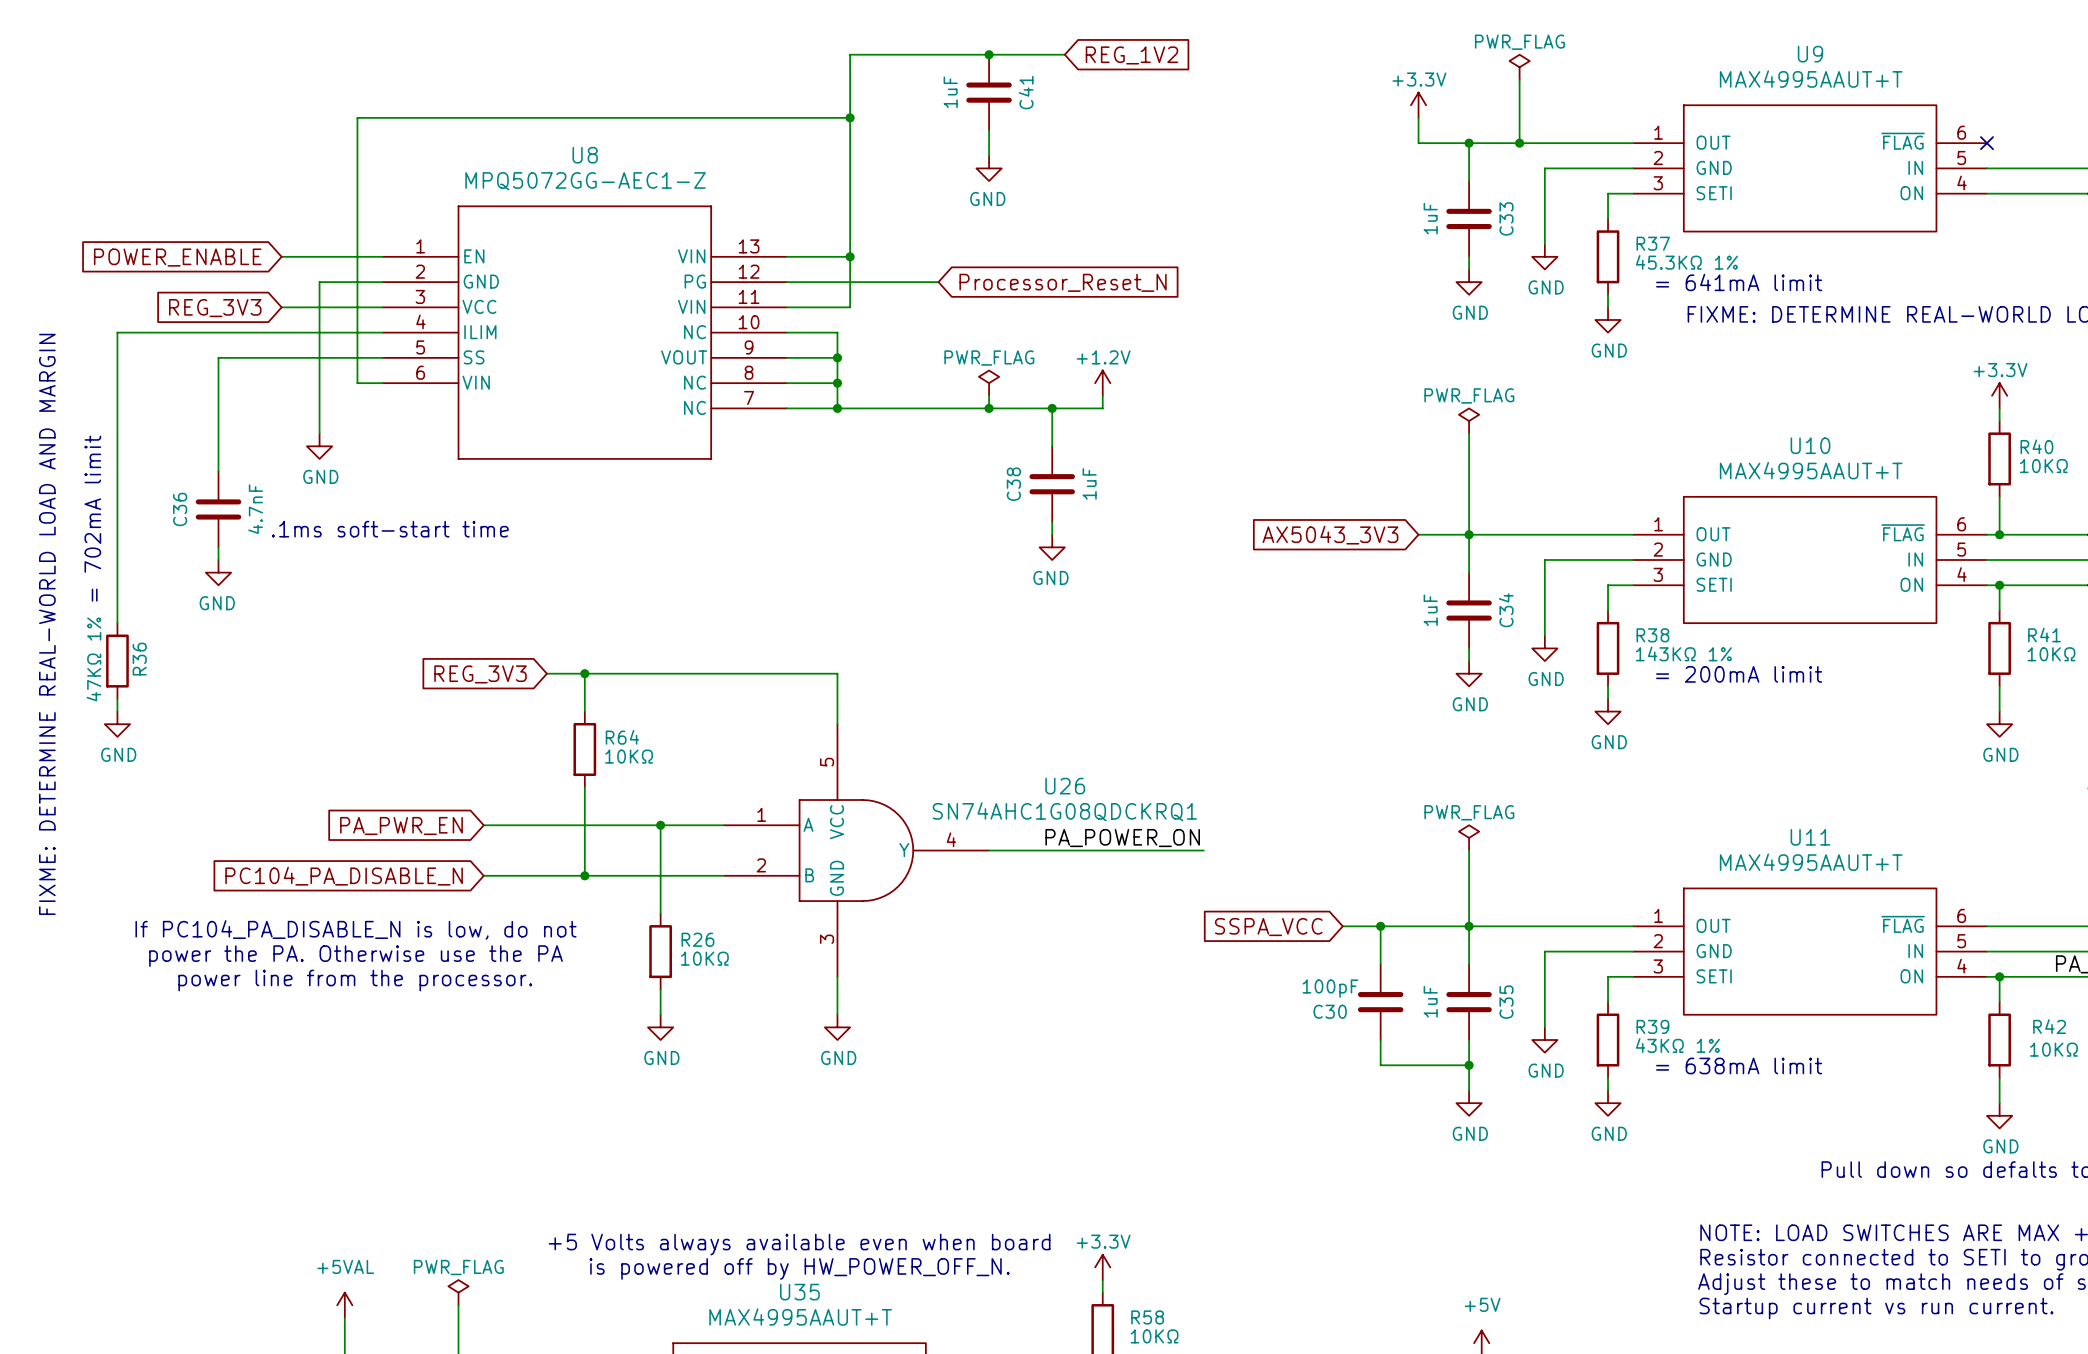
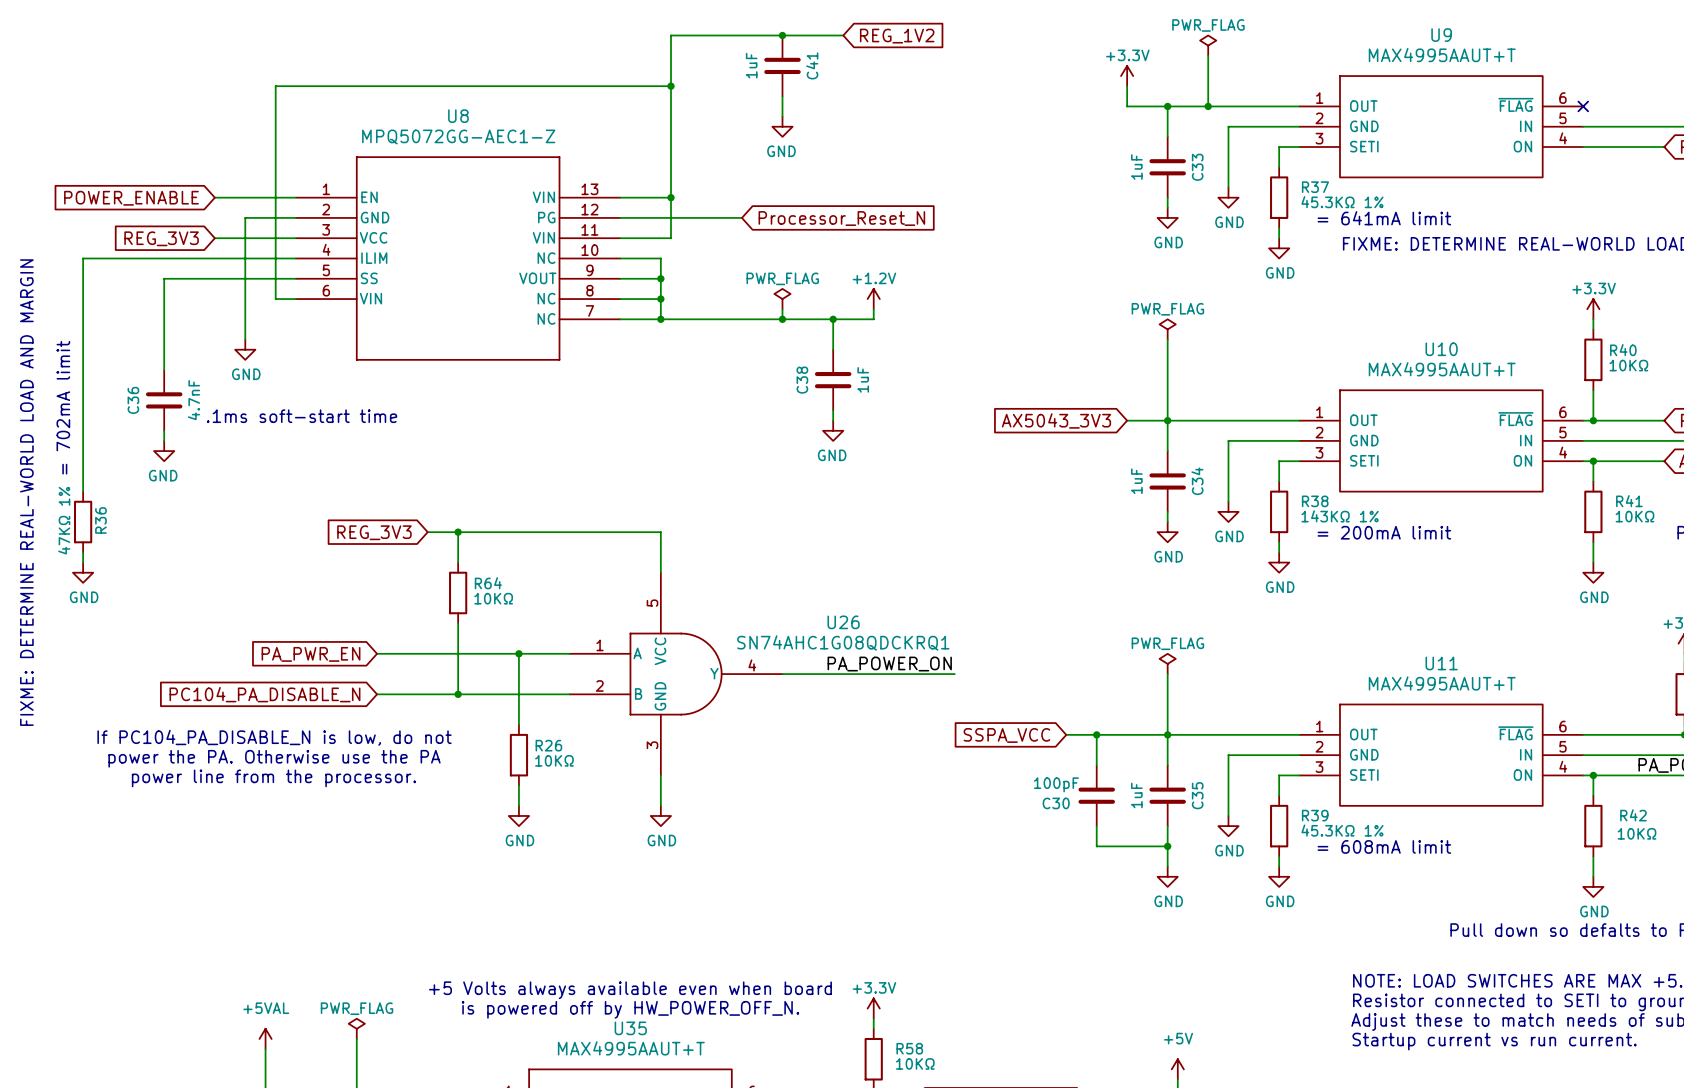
R39 value: 43KΩ 1% (1677, 1045) -> 45.3KΩ 1% (1342, 830)
text: = 638mA limit (1739, 1065) -> = 608mA limit (1384, 846)

